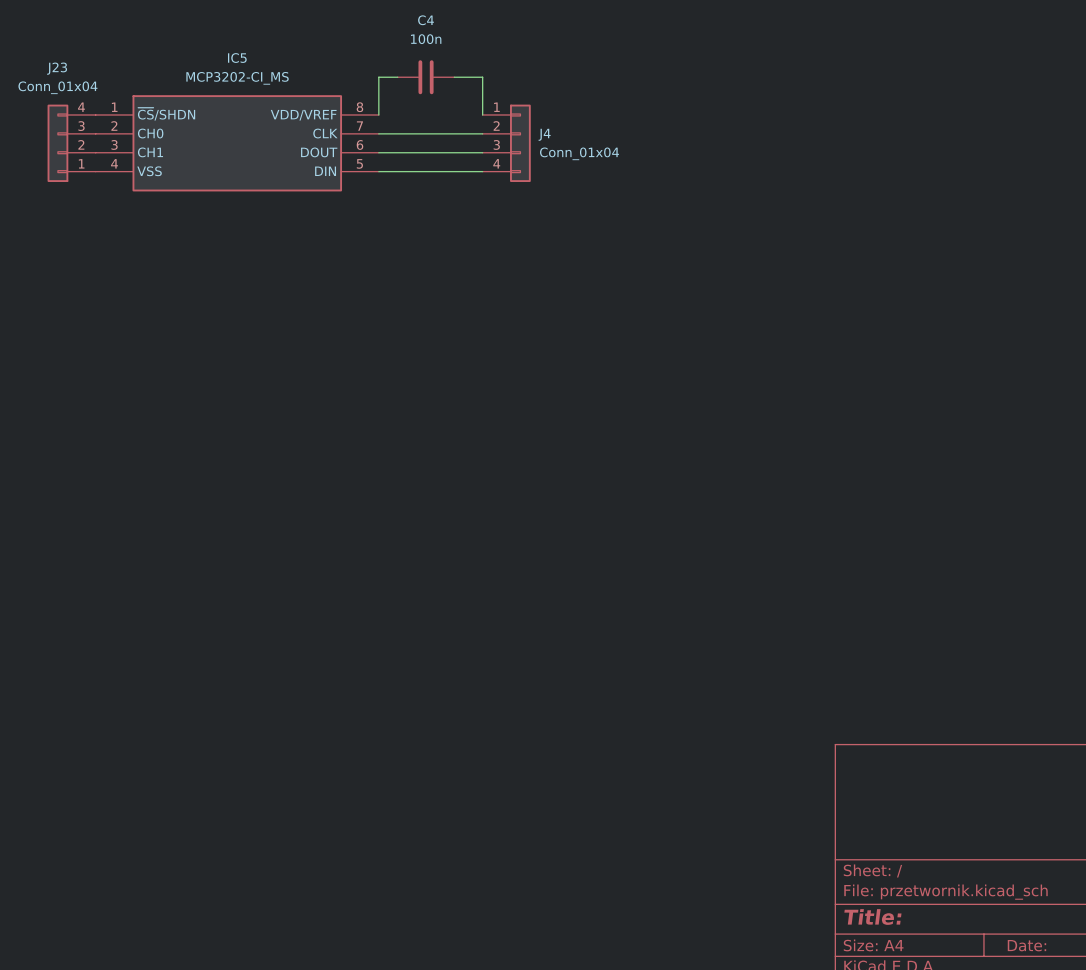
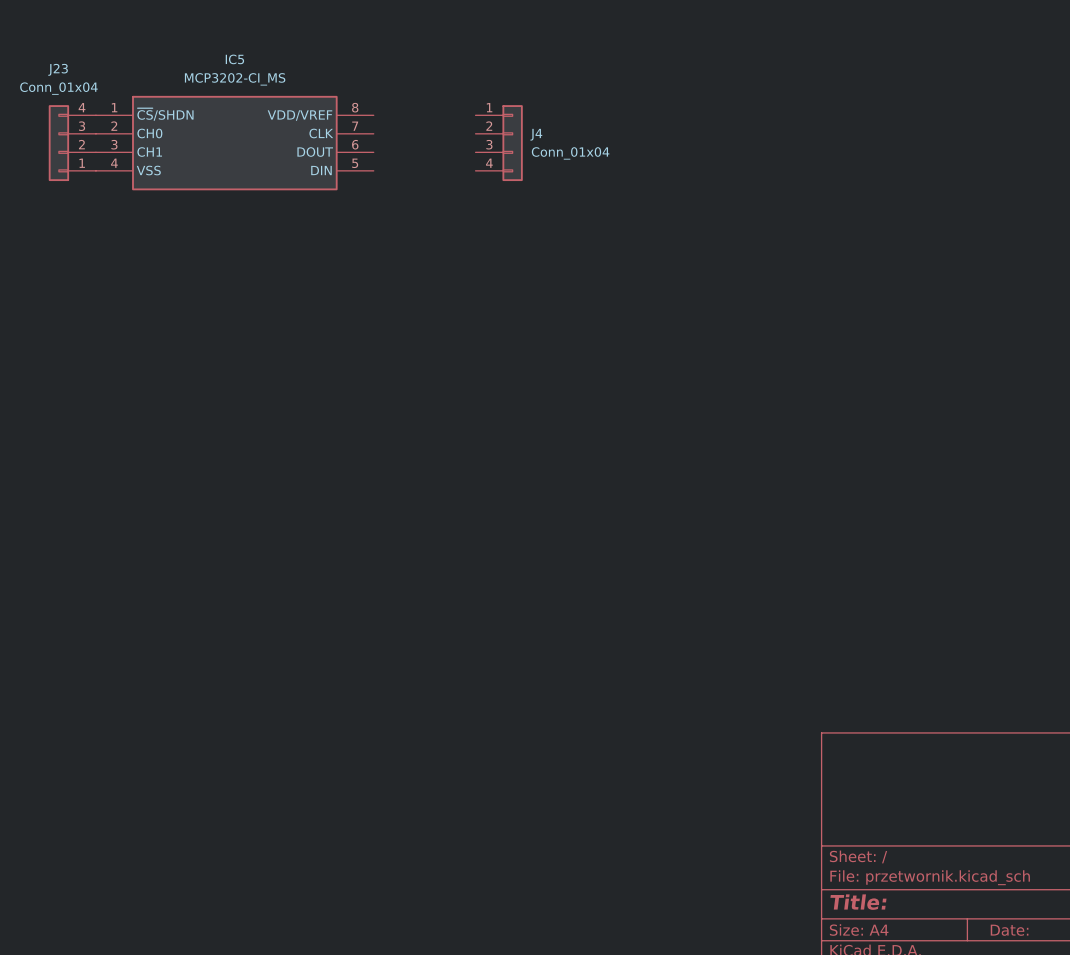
wire: (397, 77) (378, 77) (378, 114) -> none
C4: 100n (426, 77) -> none
wire: (454, 77) (482, 77) (482, 114) -> none
wire: (378, 133) (482, 133) -> none
wire: (378, 152) (482, 152) -> none
wire: (378, 171) (482, 171) -> none

